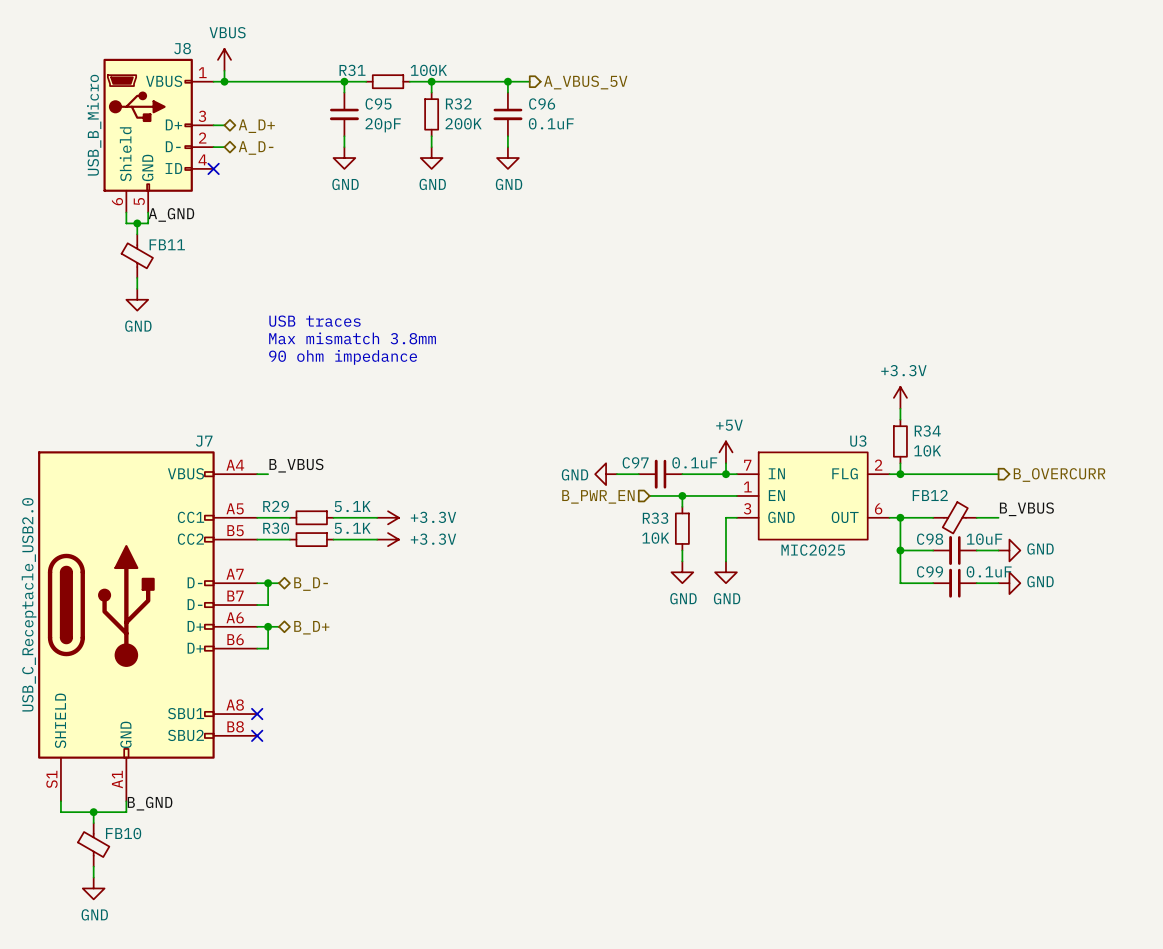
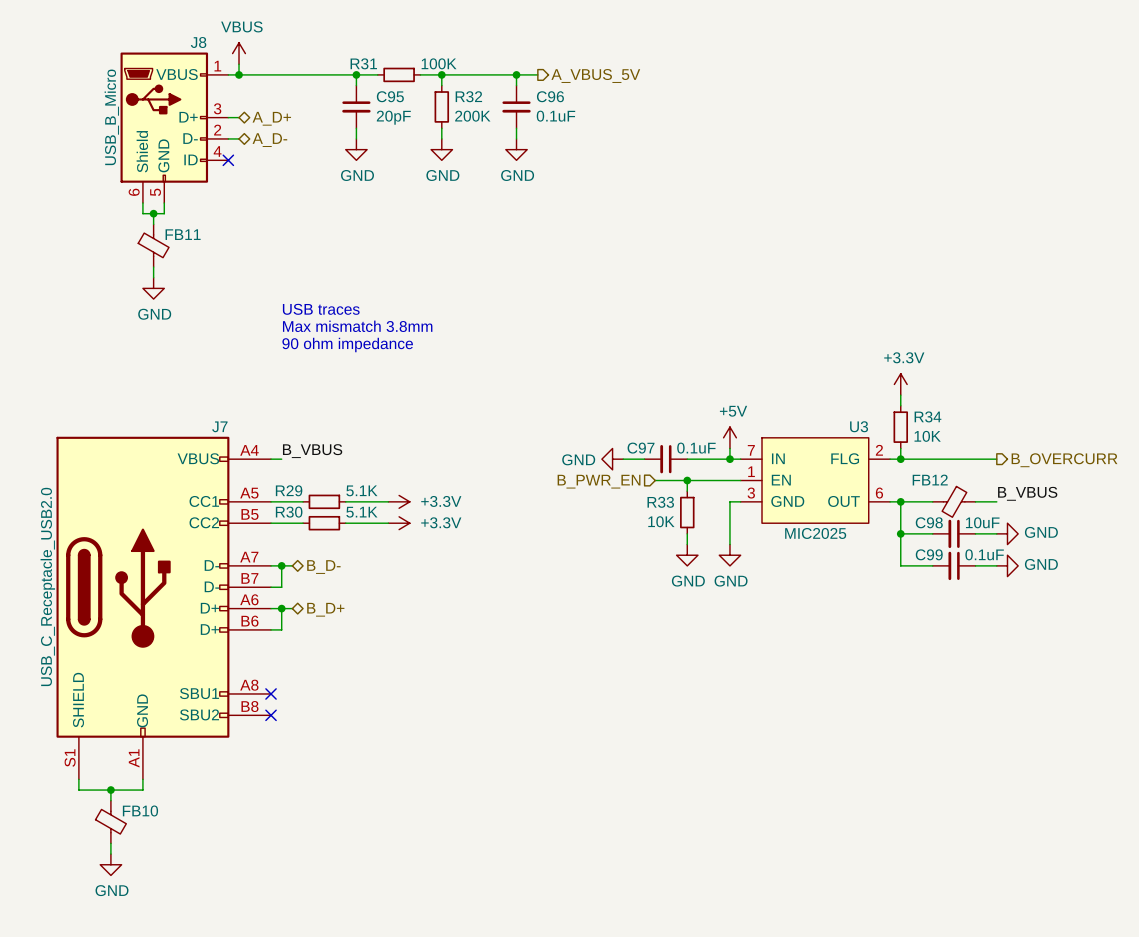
label: A_GND (171, 214) -> none
label: B_GND (150, 803) -> none

